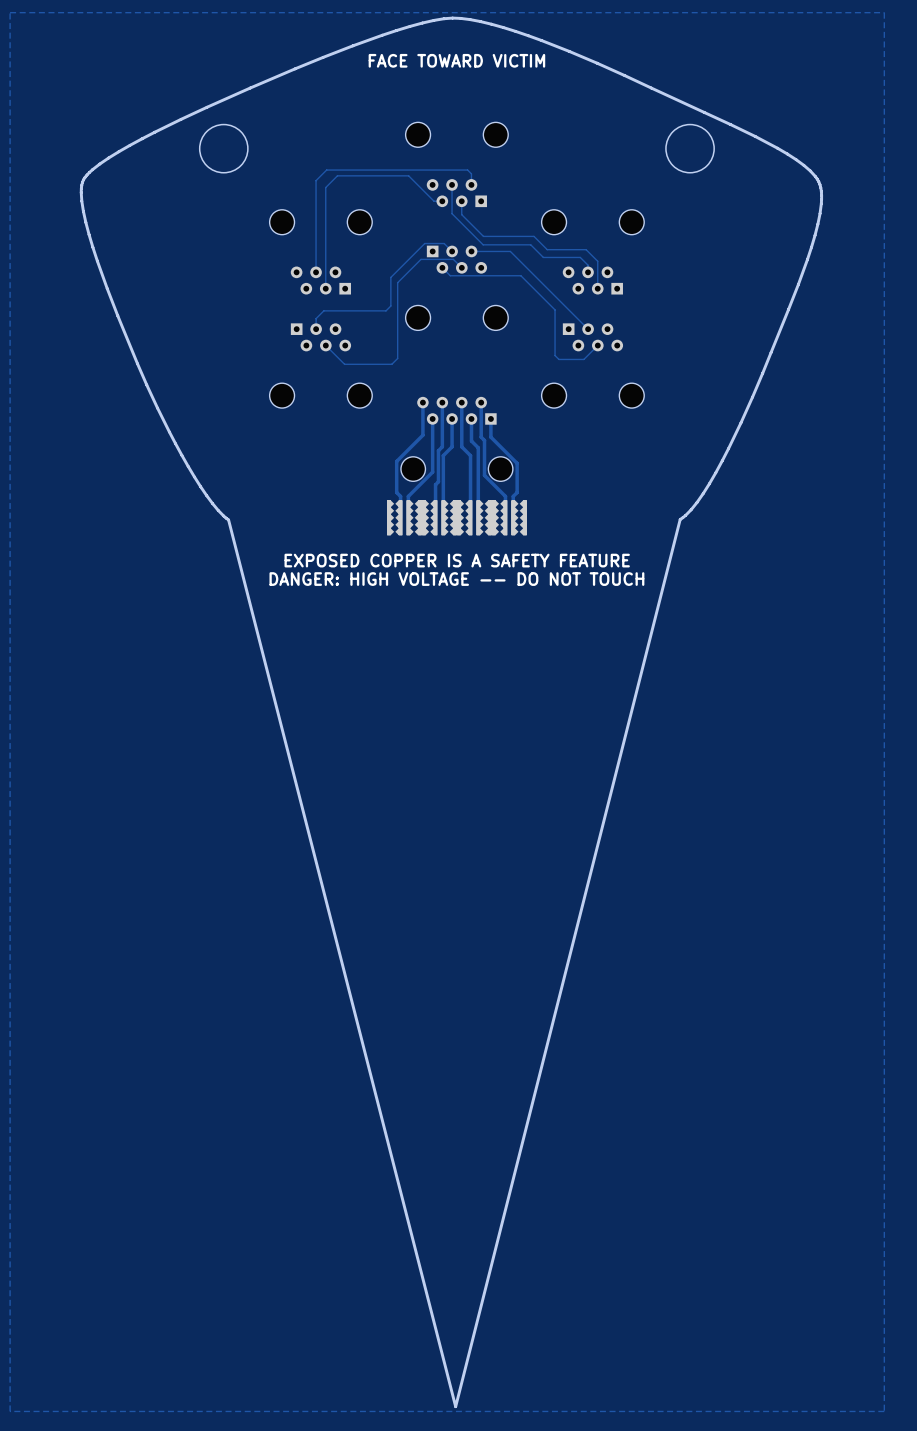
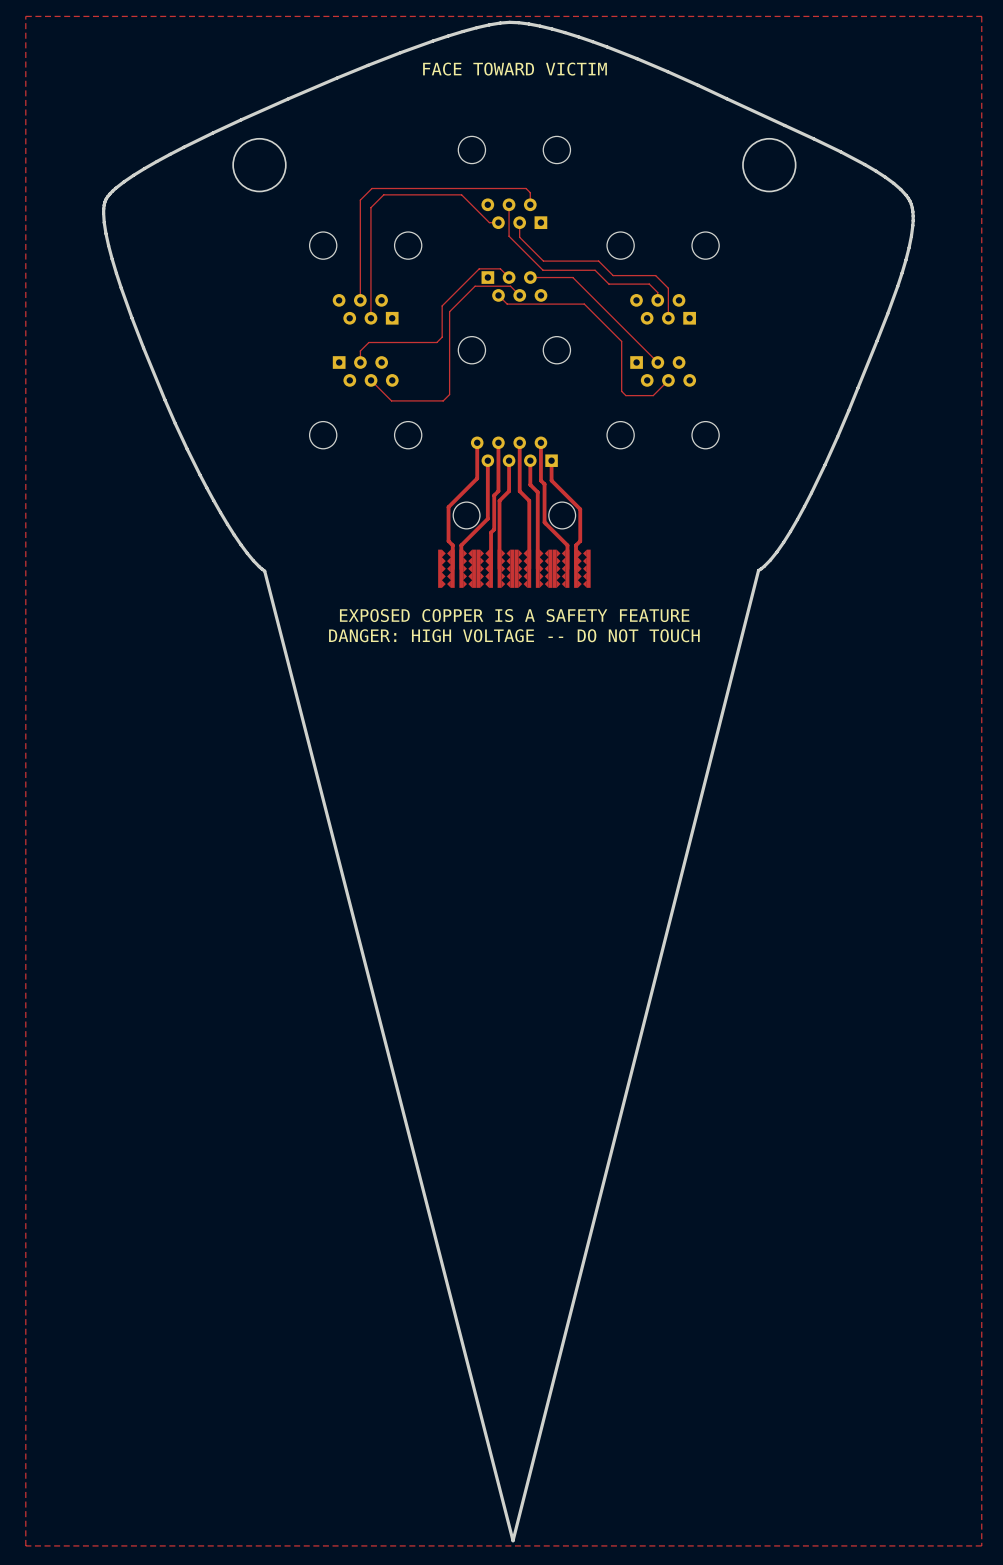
part footprint: [387, 500, 403, 536] -> [438, 549, 455, 588]
part footprint: [406, 500, 422, 536] -> [459, 549, 476, 588]
part footprint: [422, 500, 438, 536] -> [476, 549, 493, 588]
part footprint: [441, 500, 457, 536] -> [497, 549, 515, 588]
part footprint: [457, 500, 473, 536] -> [514, 549, 532, 588]
part footprint: [476, 500, 492, 536] -> [535, 549, 553, 588]
part footprint: [492, 500, 508, 536] -> [552, 549, 570, 588]
part footprint: [511, 500, 527, 536] -> [574, 549, 591, 588]

